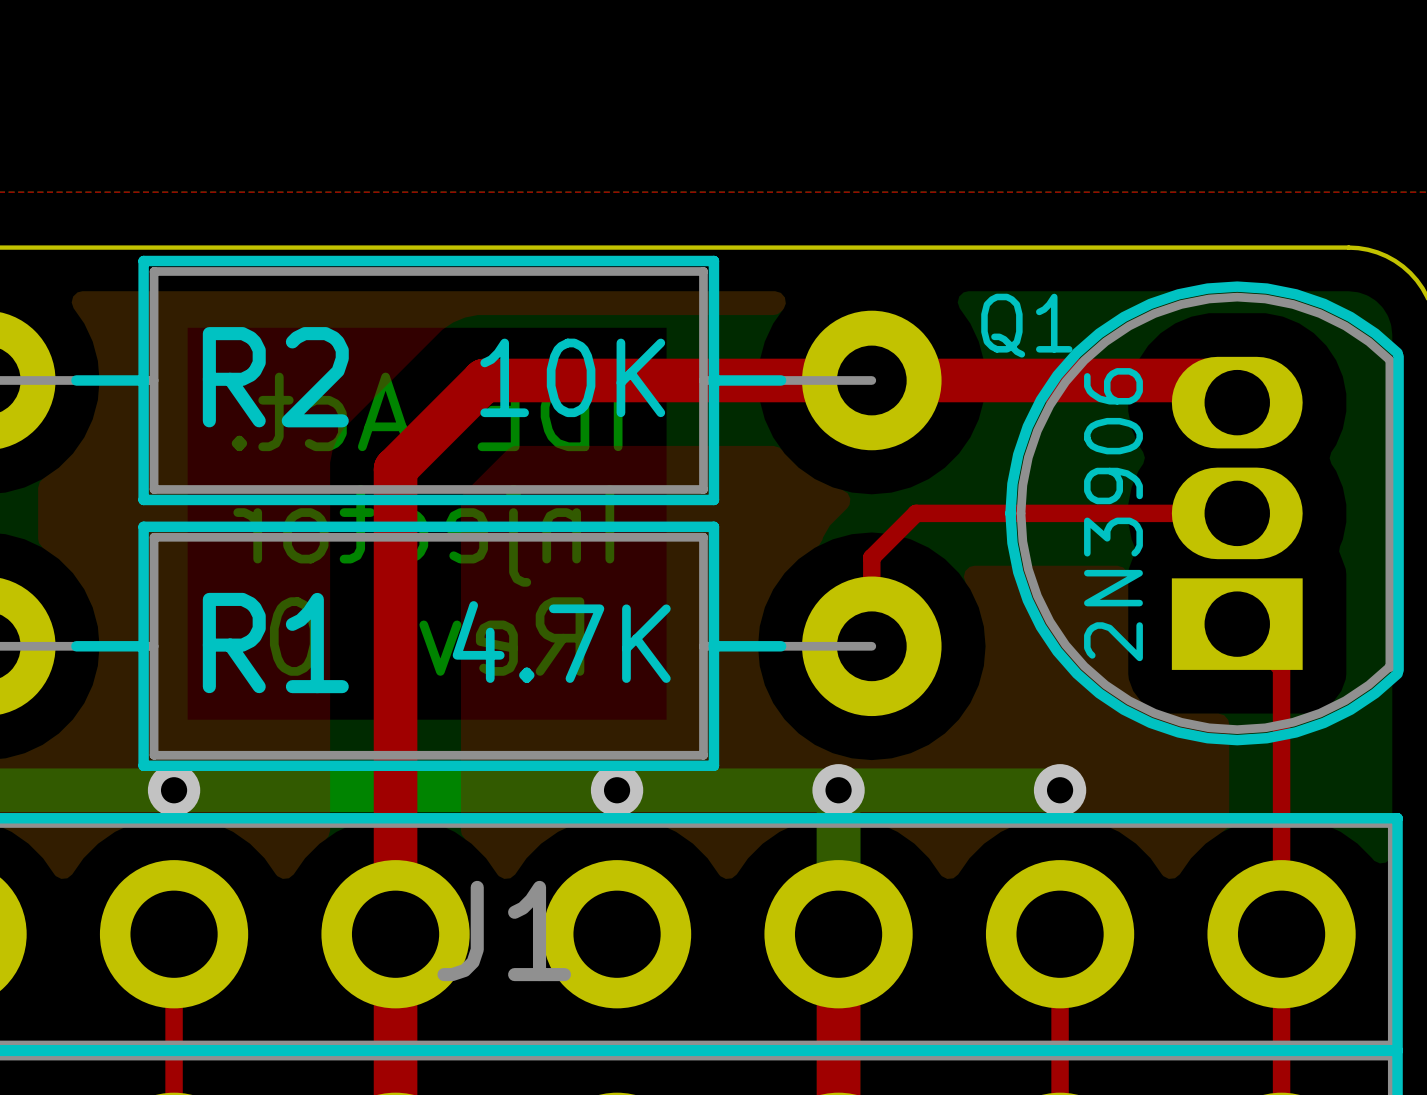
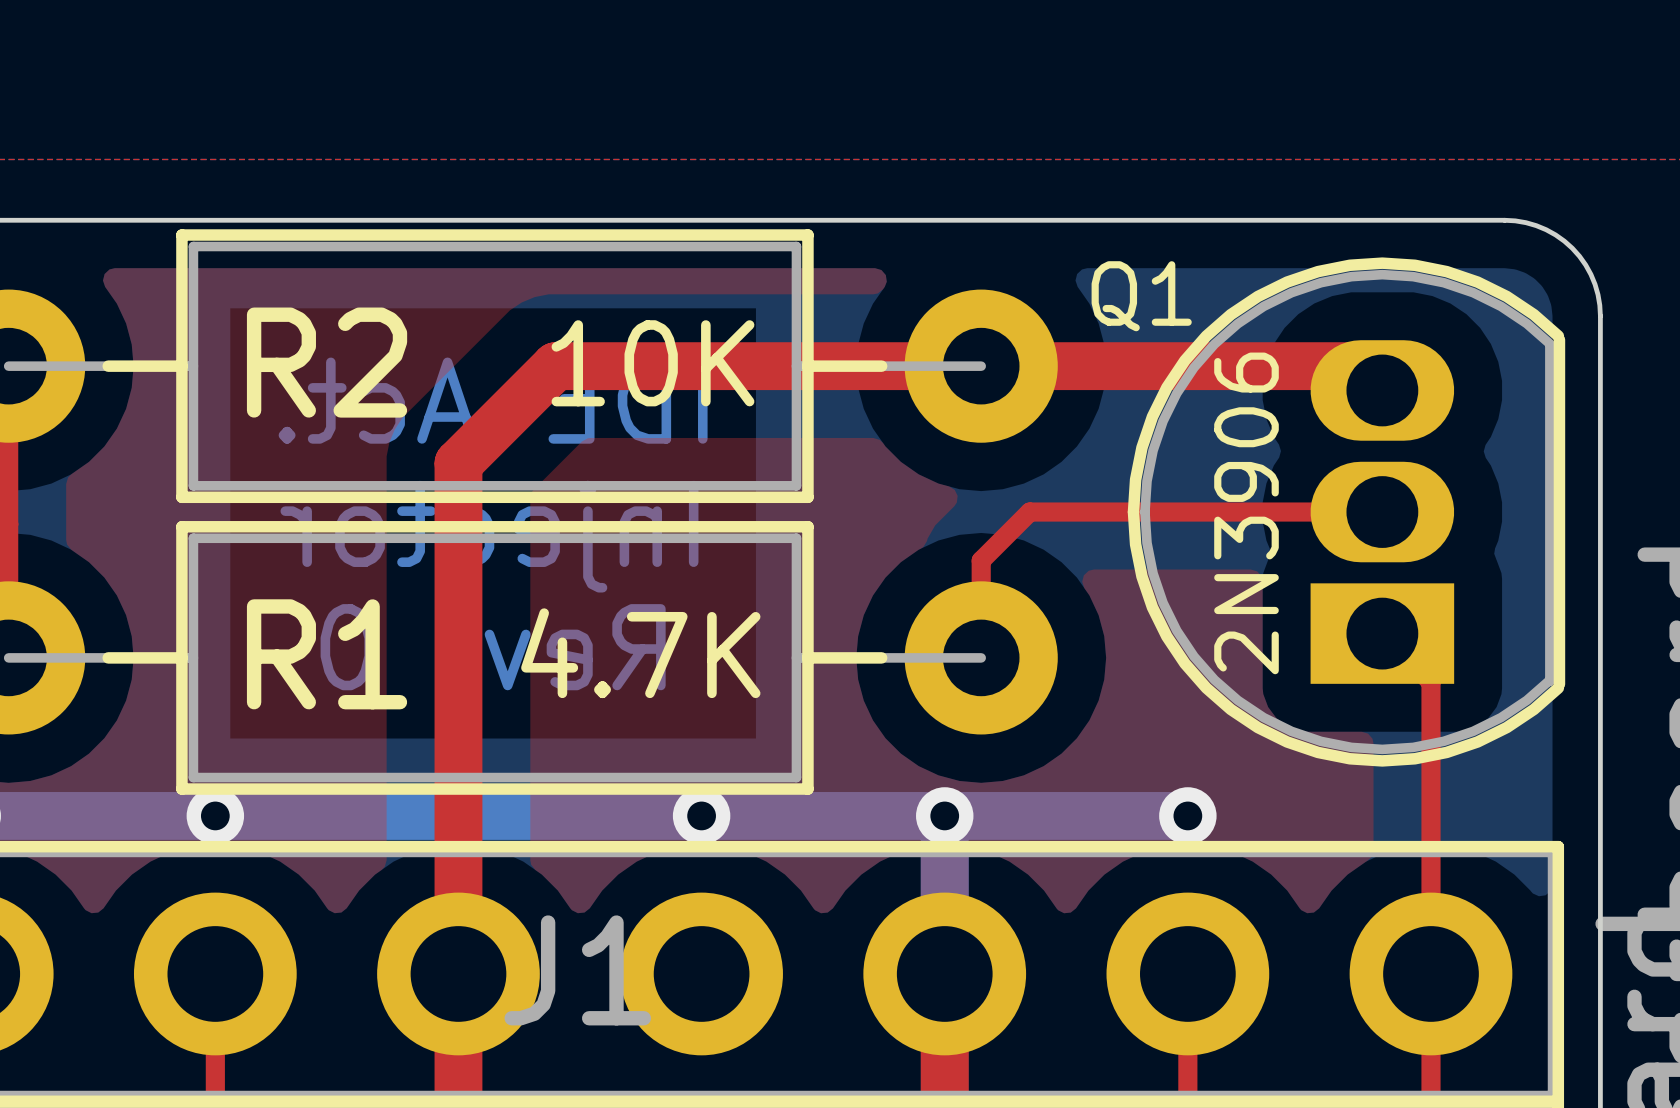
Q1 name position: Q1 (1026, 325) -> Q1 (1141, 296)

